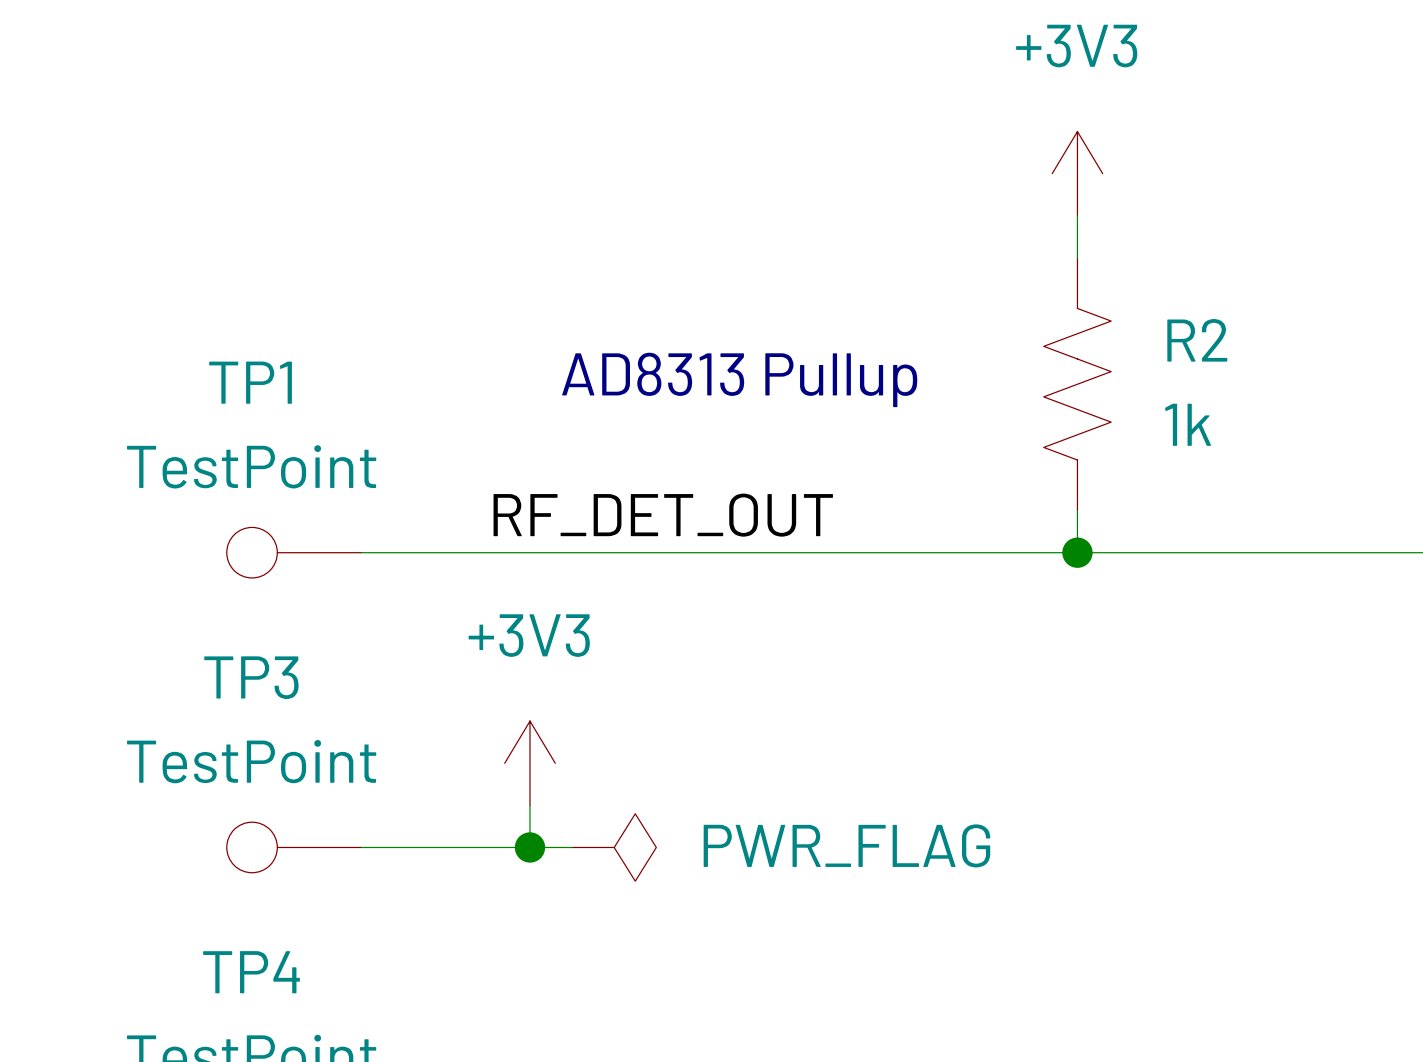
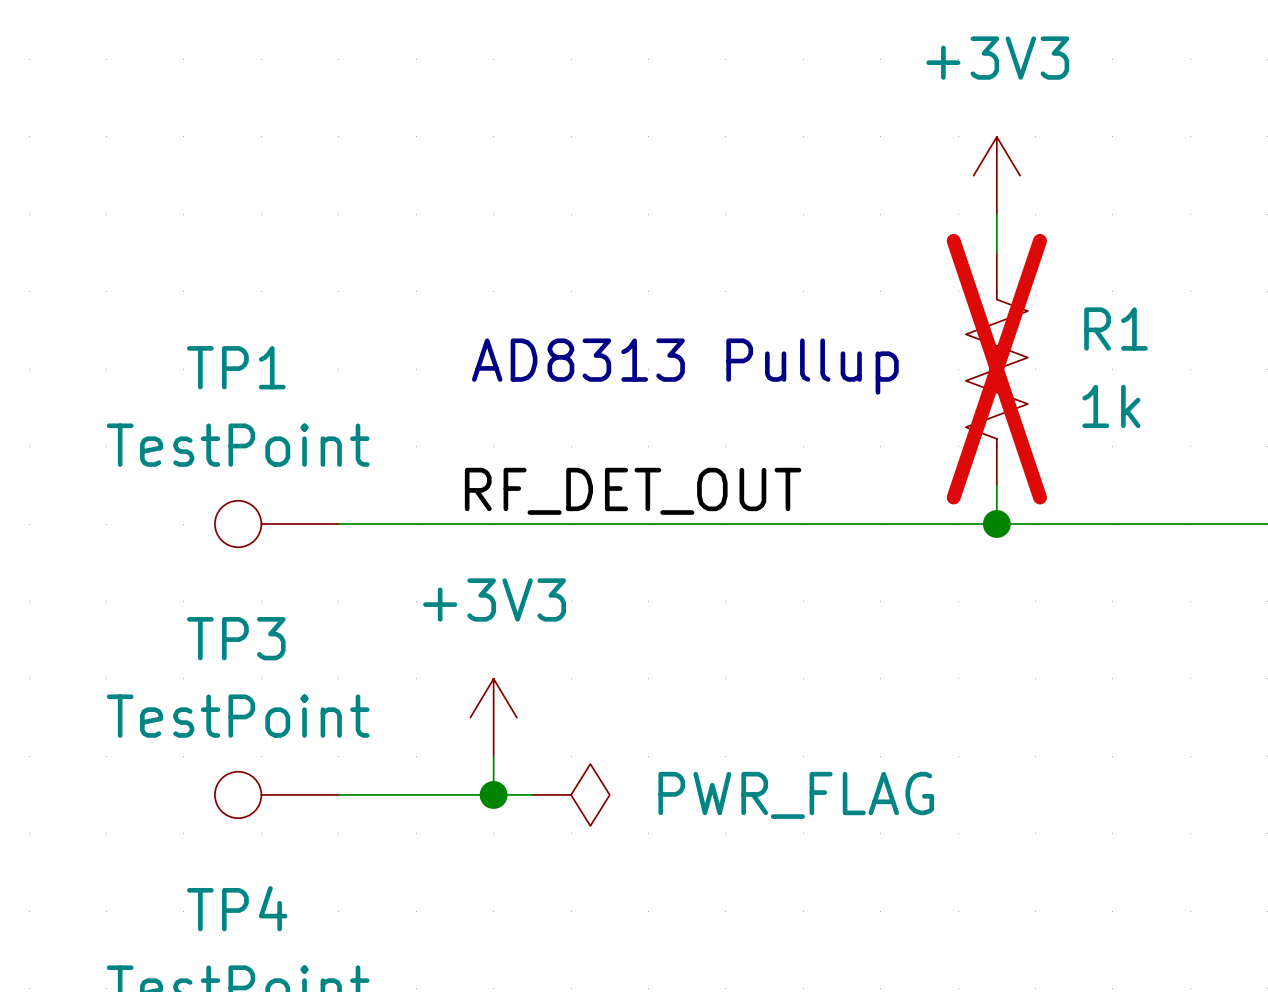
R2 name: R2 (1197, 340) -> R1 (1116, 329)
R2 do-not-place cross: none -> (996, 369)

